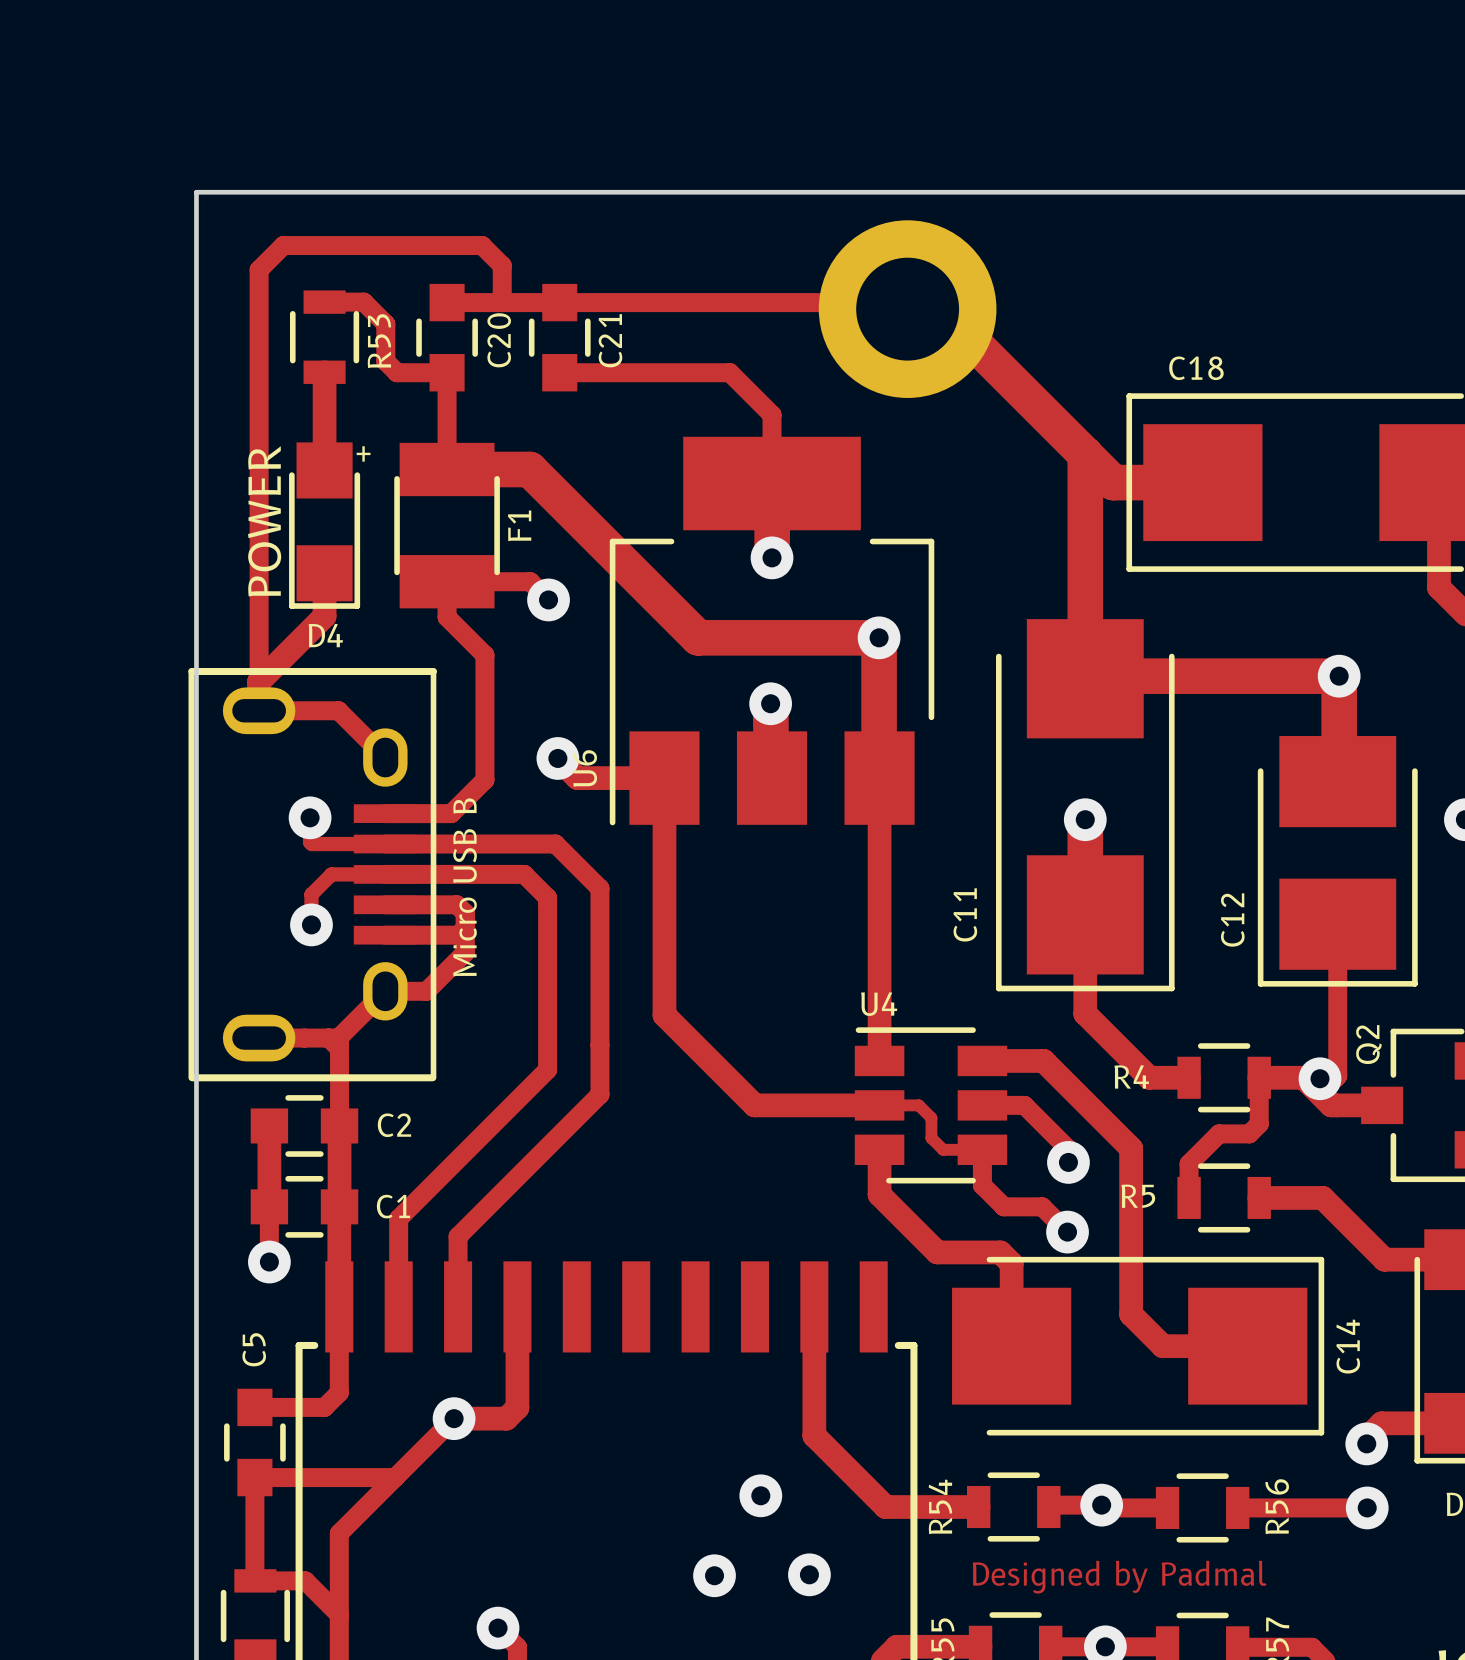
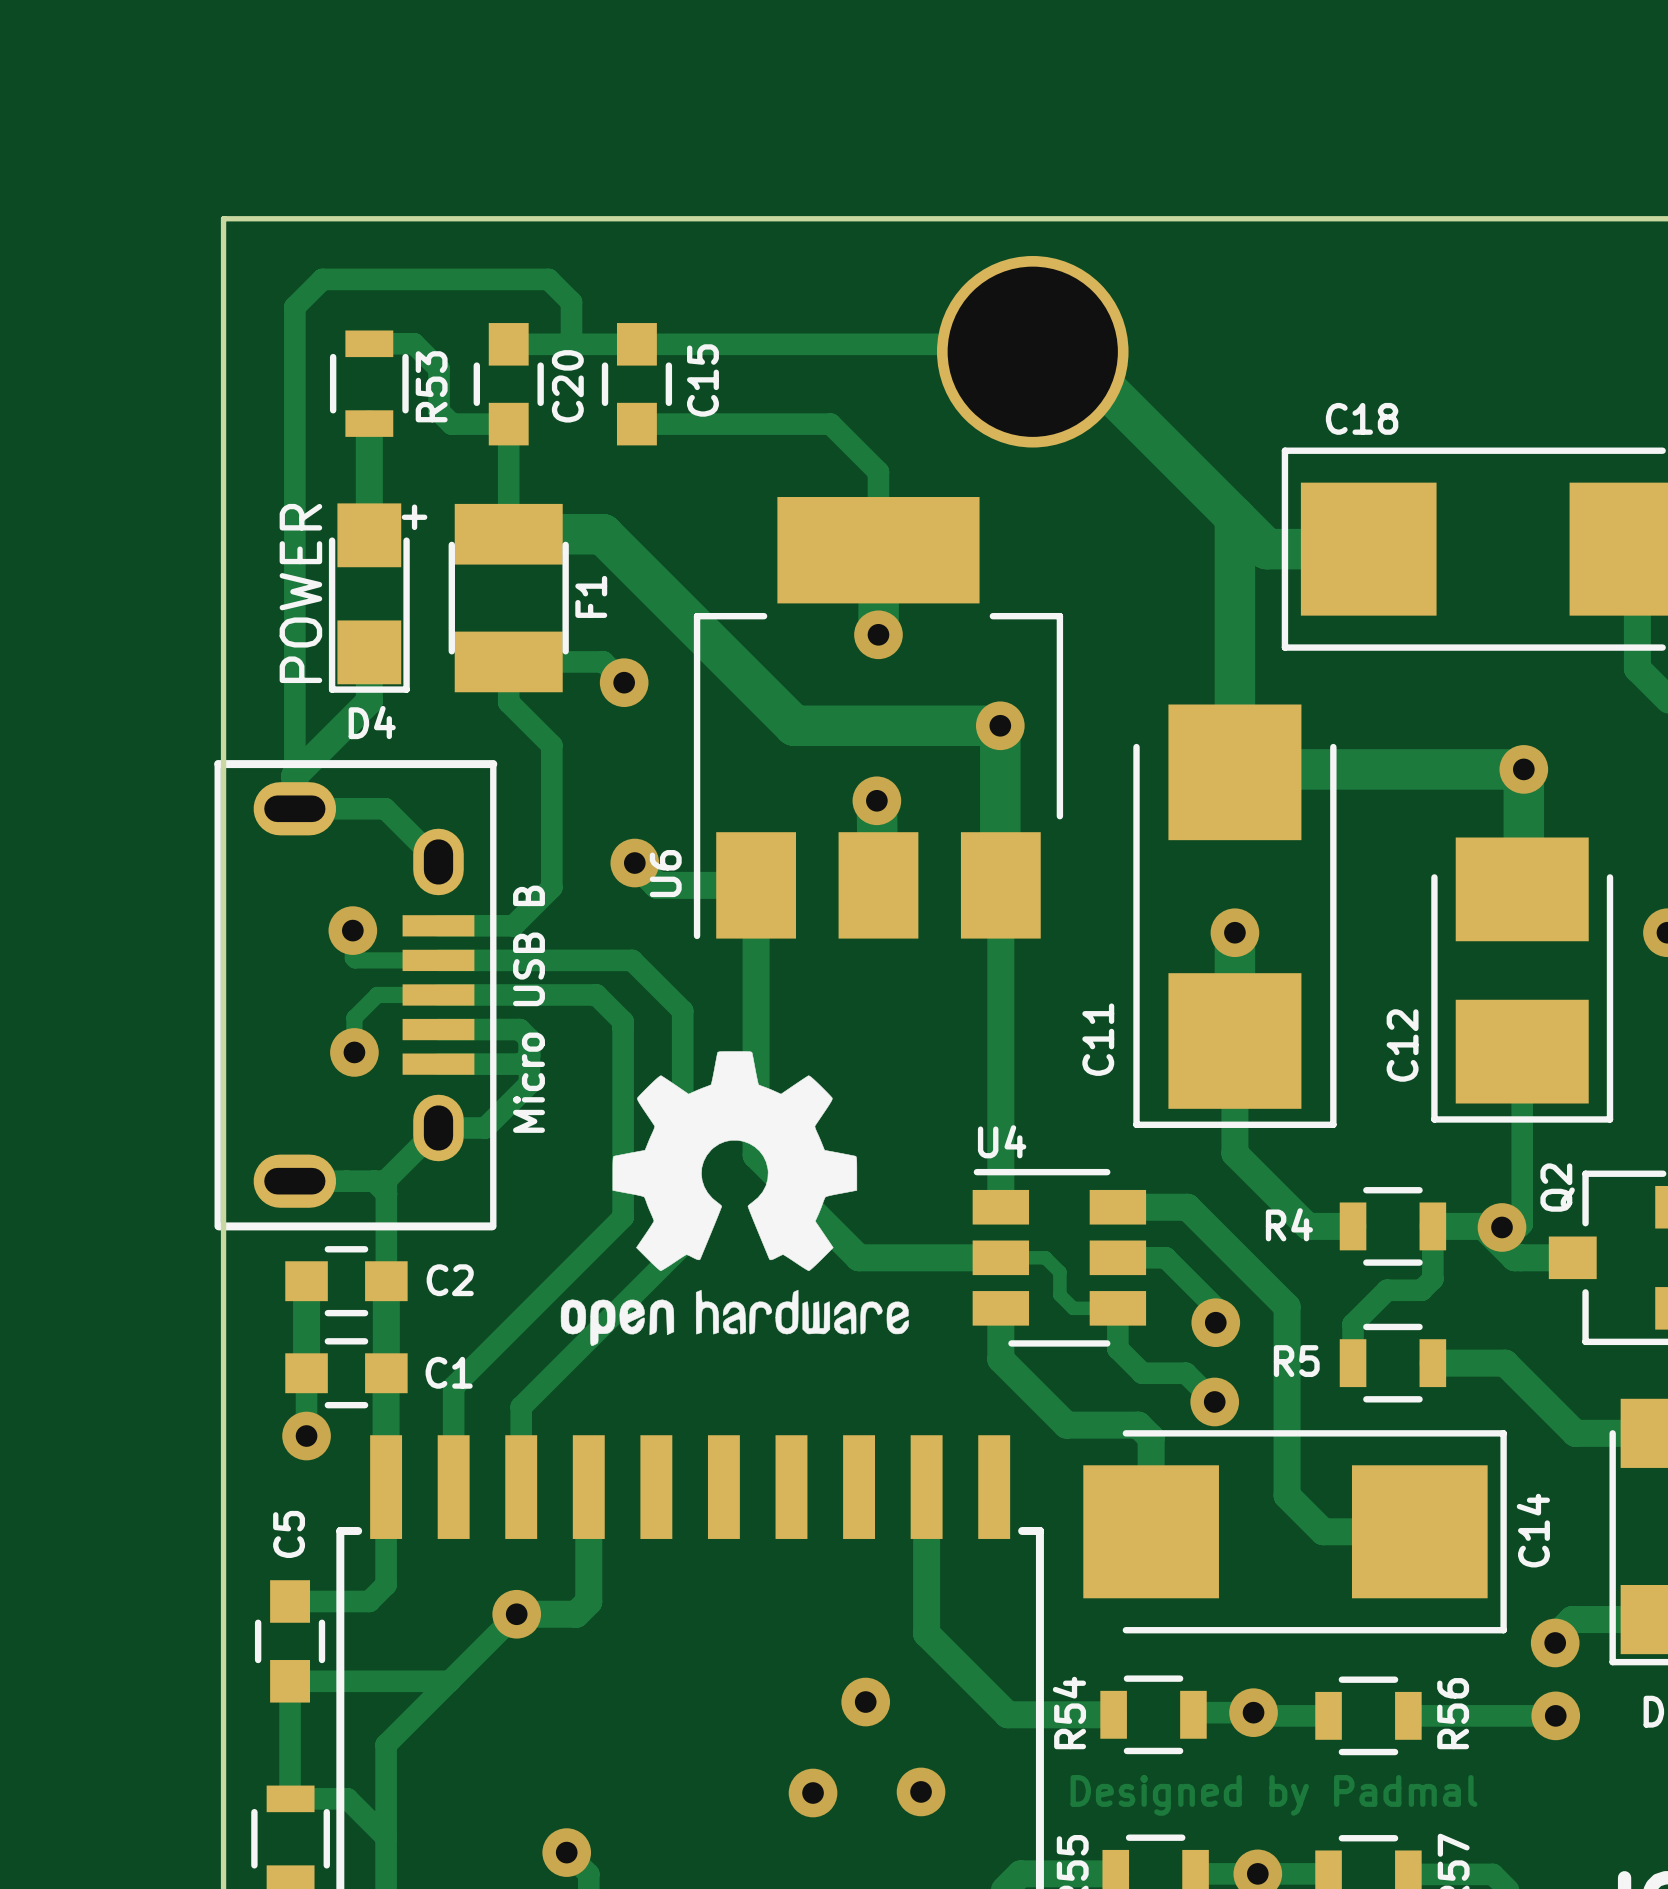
part footprint: [818, 220, 997, 398] -> [937, 256, 1129, 448]
C21 name: C21 (610, 340) -> C15 (702, 380)
drawing: none -> [560, 1051, 909, 1346]

